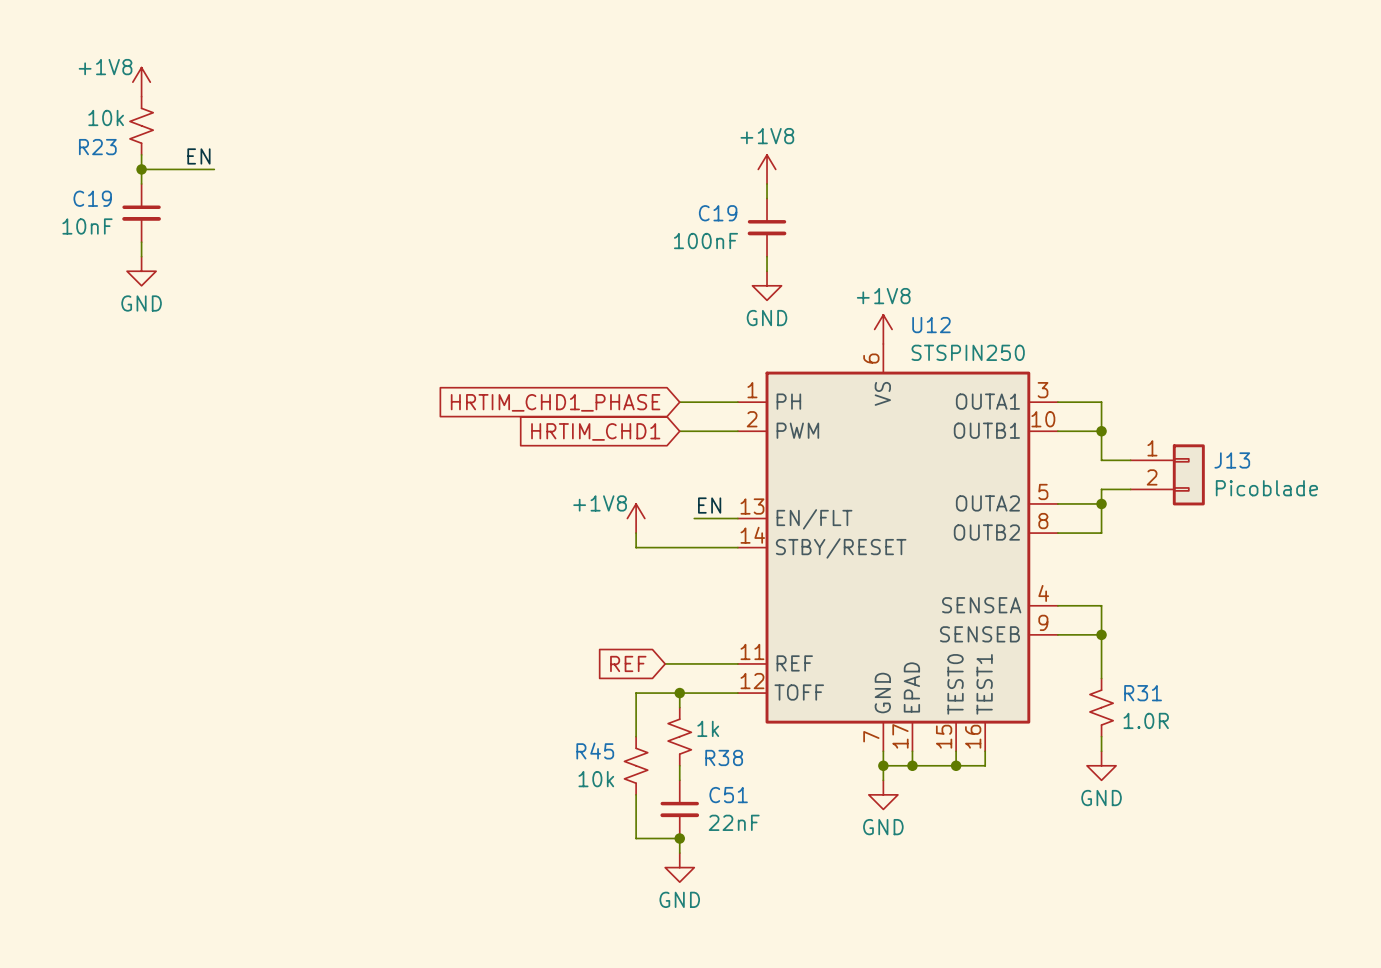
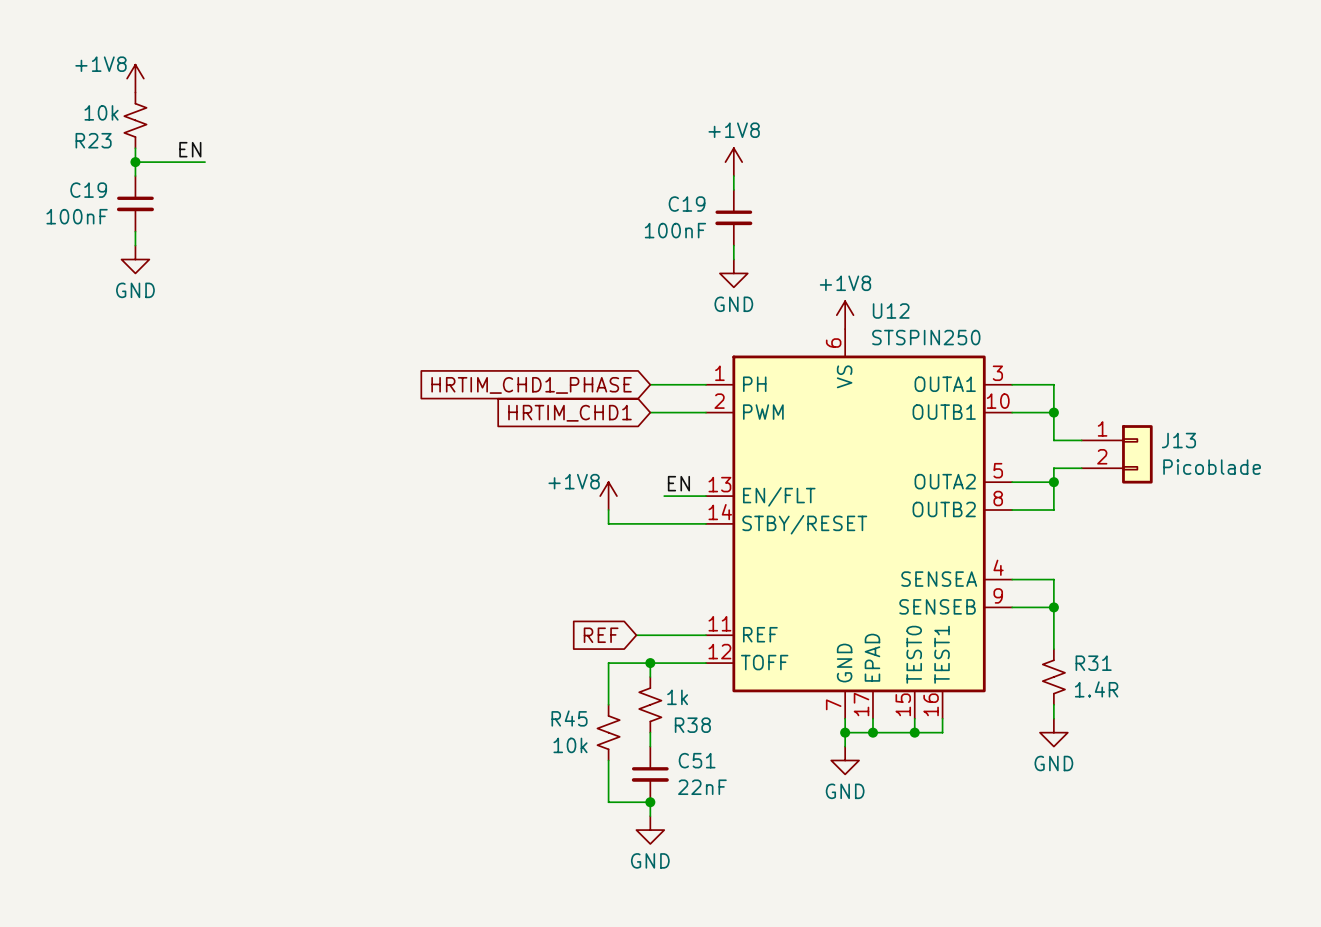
C19 value: 10nF (87, 226) -> 100nF (77, 216)
R31 value: 1.0R (1146, 720) -> 1.4R (1096, 689)

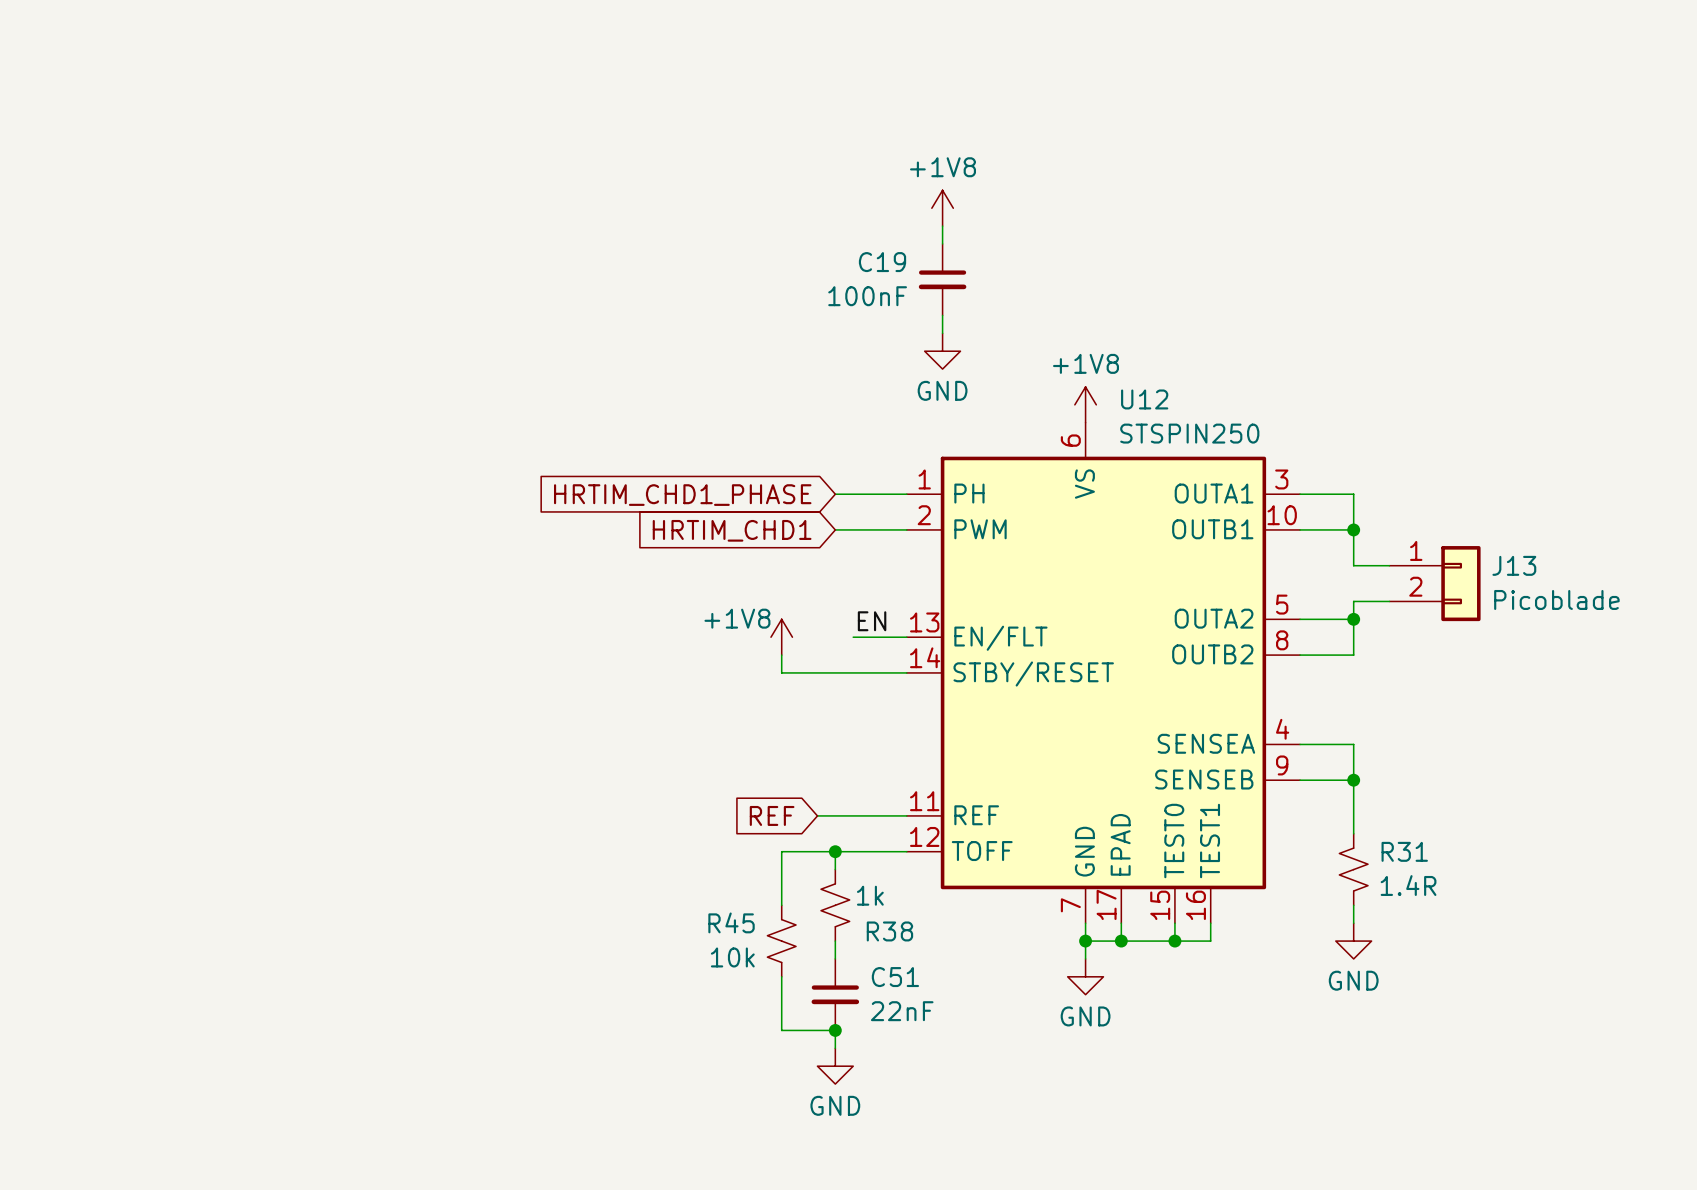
power symbol: +1V8 (135, 78) -> none
R23: 10k (135, 120) -> none
wire: (135, 148) (135, 176) -> none
label: EN (190, 149) -> none
wire: (135, 162) (205, 162) -> none
junction: (135, 162) -> none
C19: 100nF (135, 203) -> none
wire: (135, 231) (135, 245) -> none
power symbol: GND (135, 259) -> none

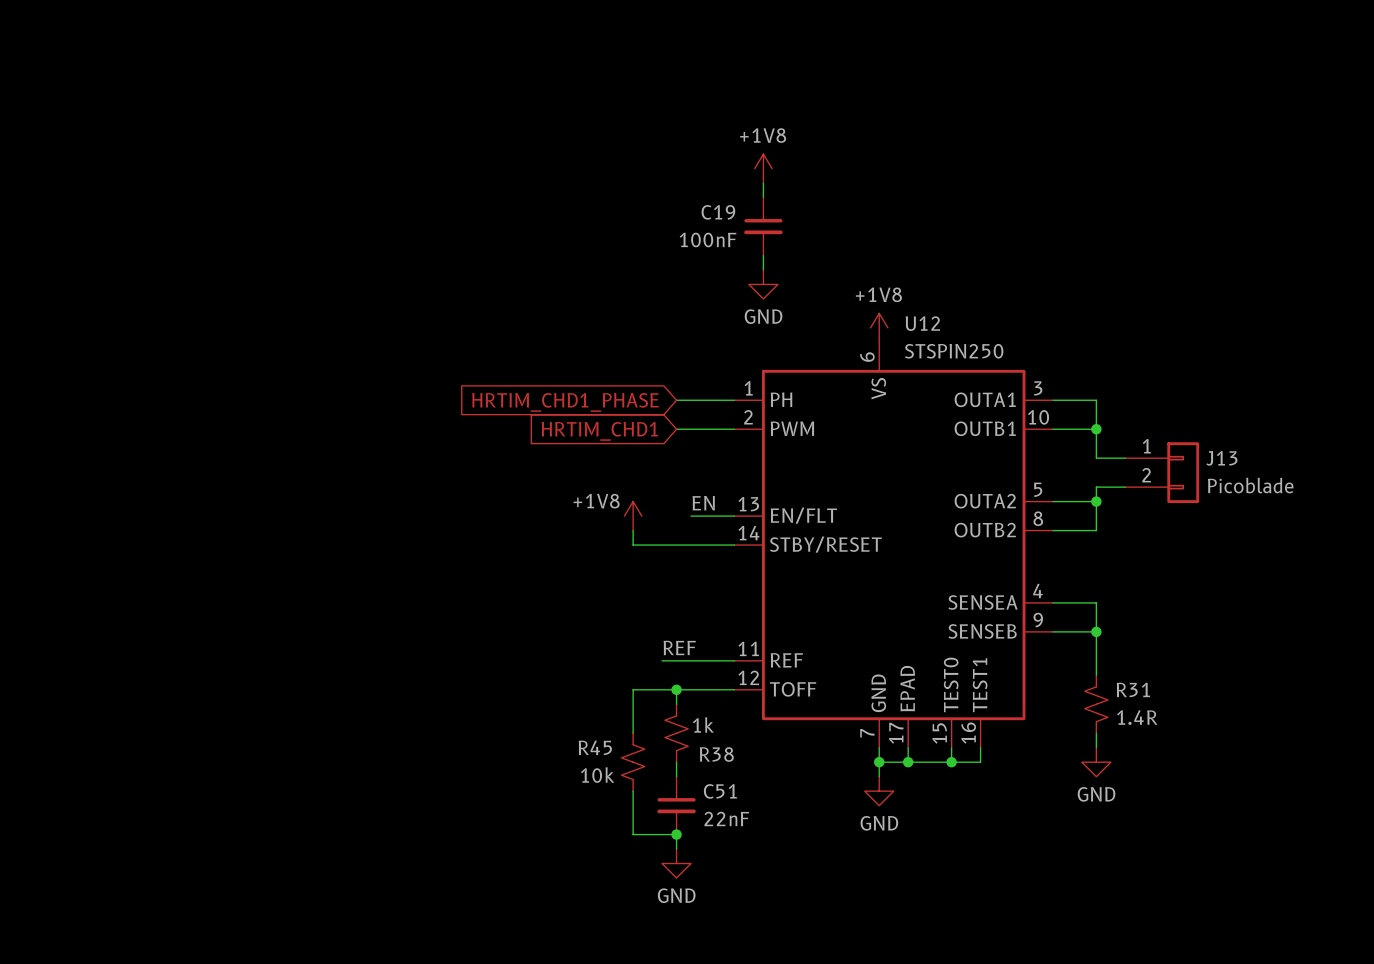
label: none -> REF (679, 647)
global label: REF (772, 815) -> none

